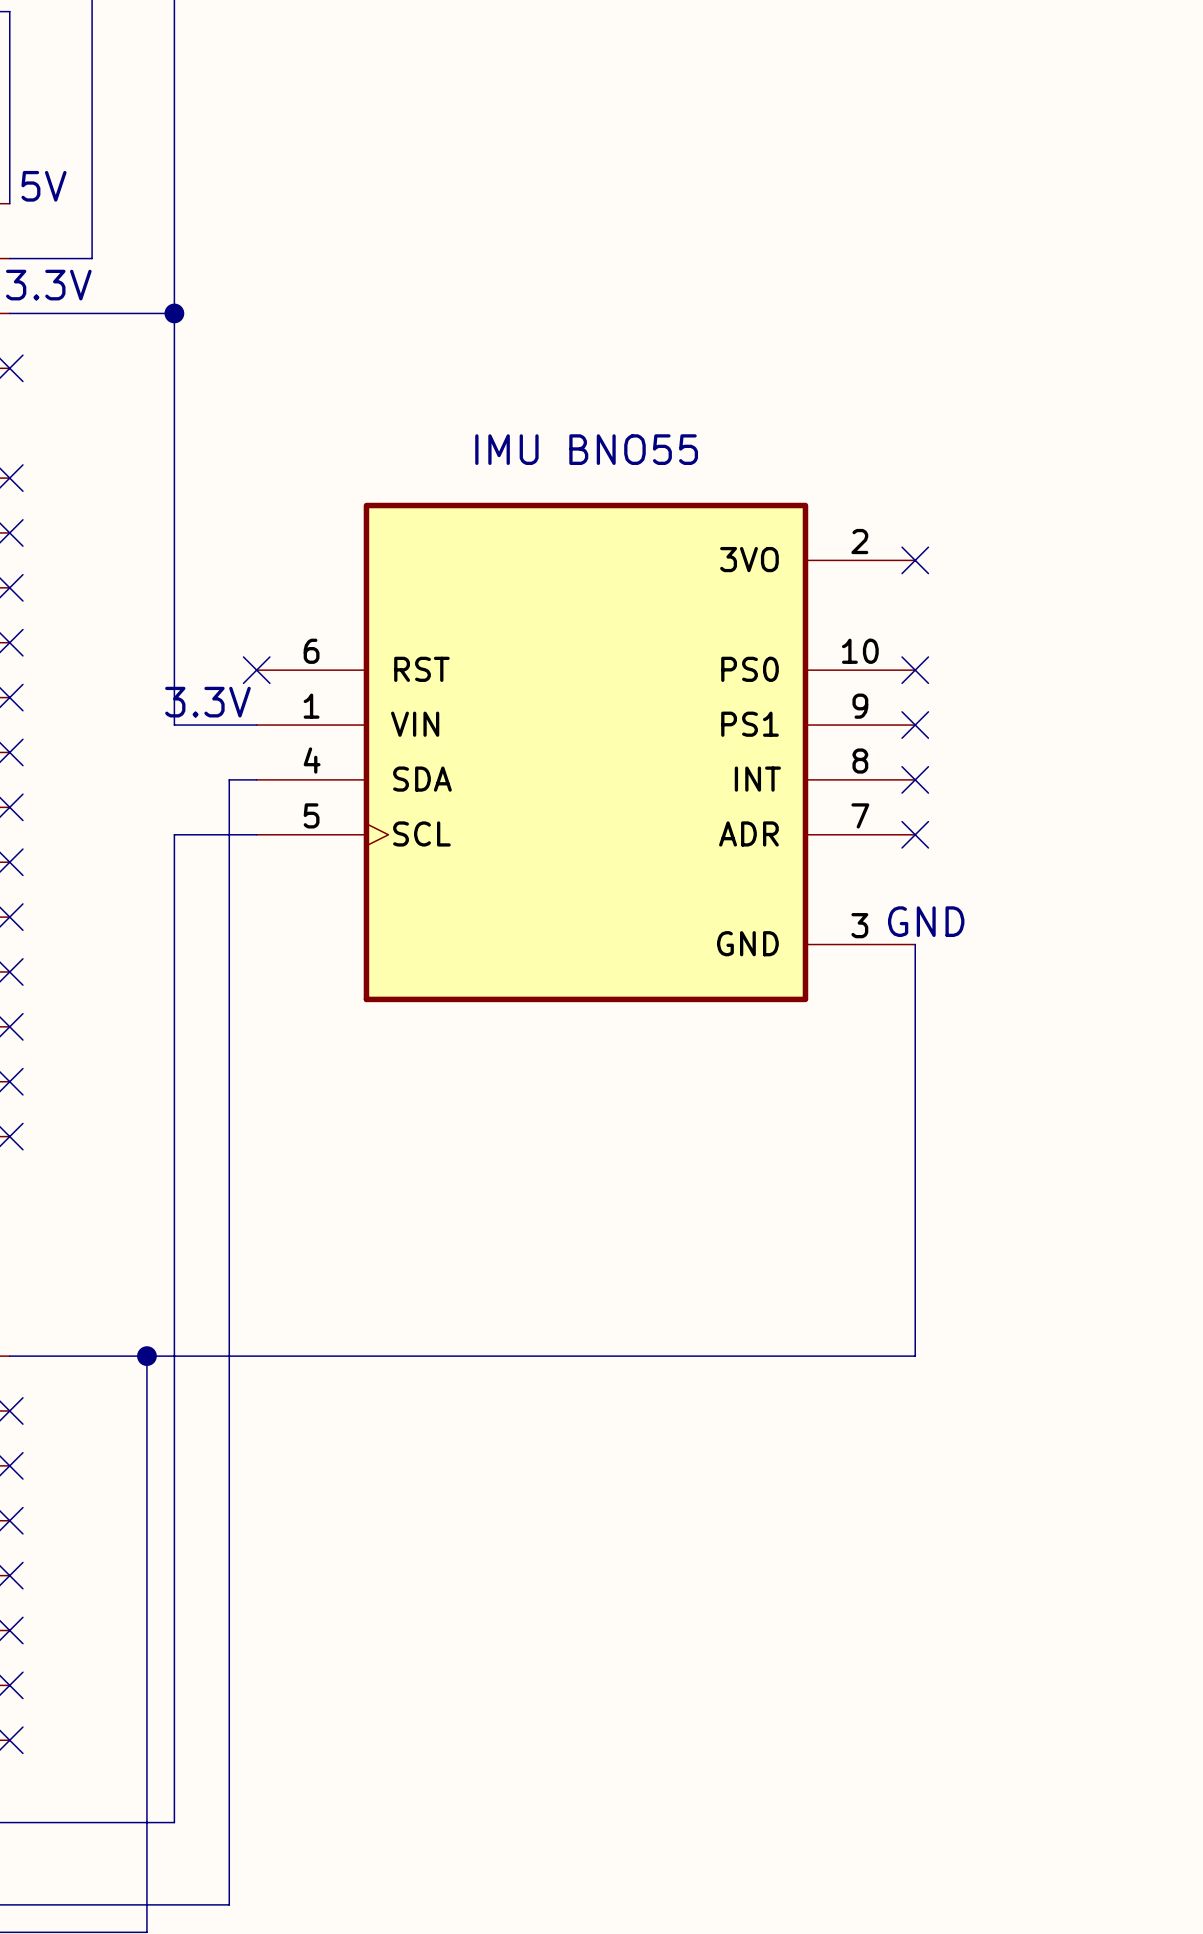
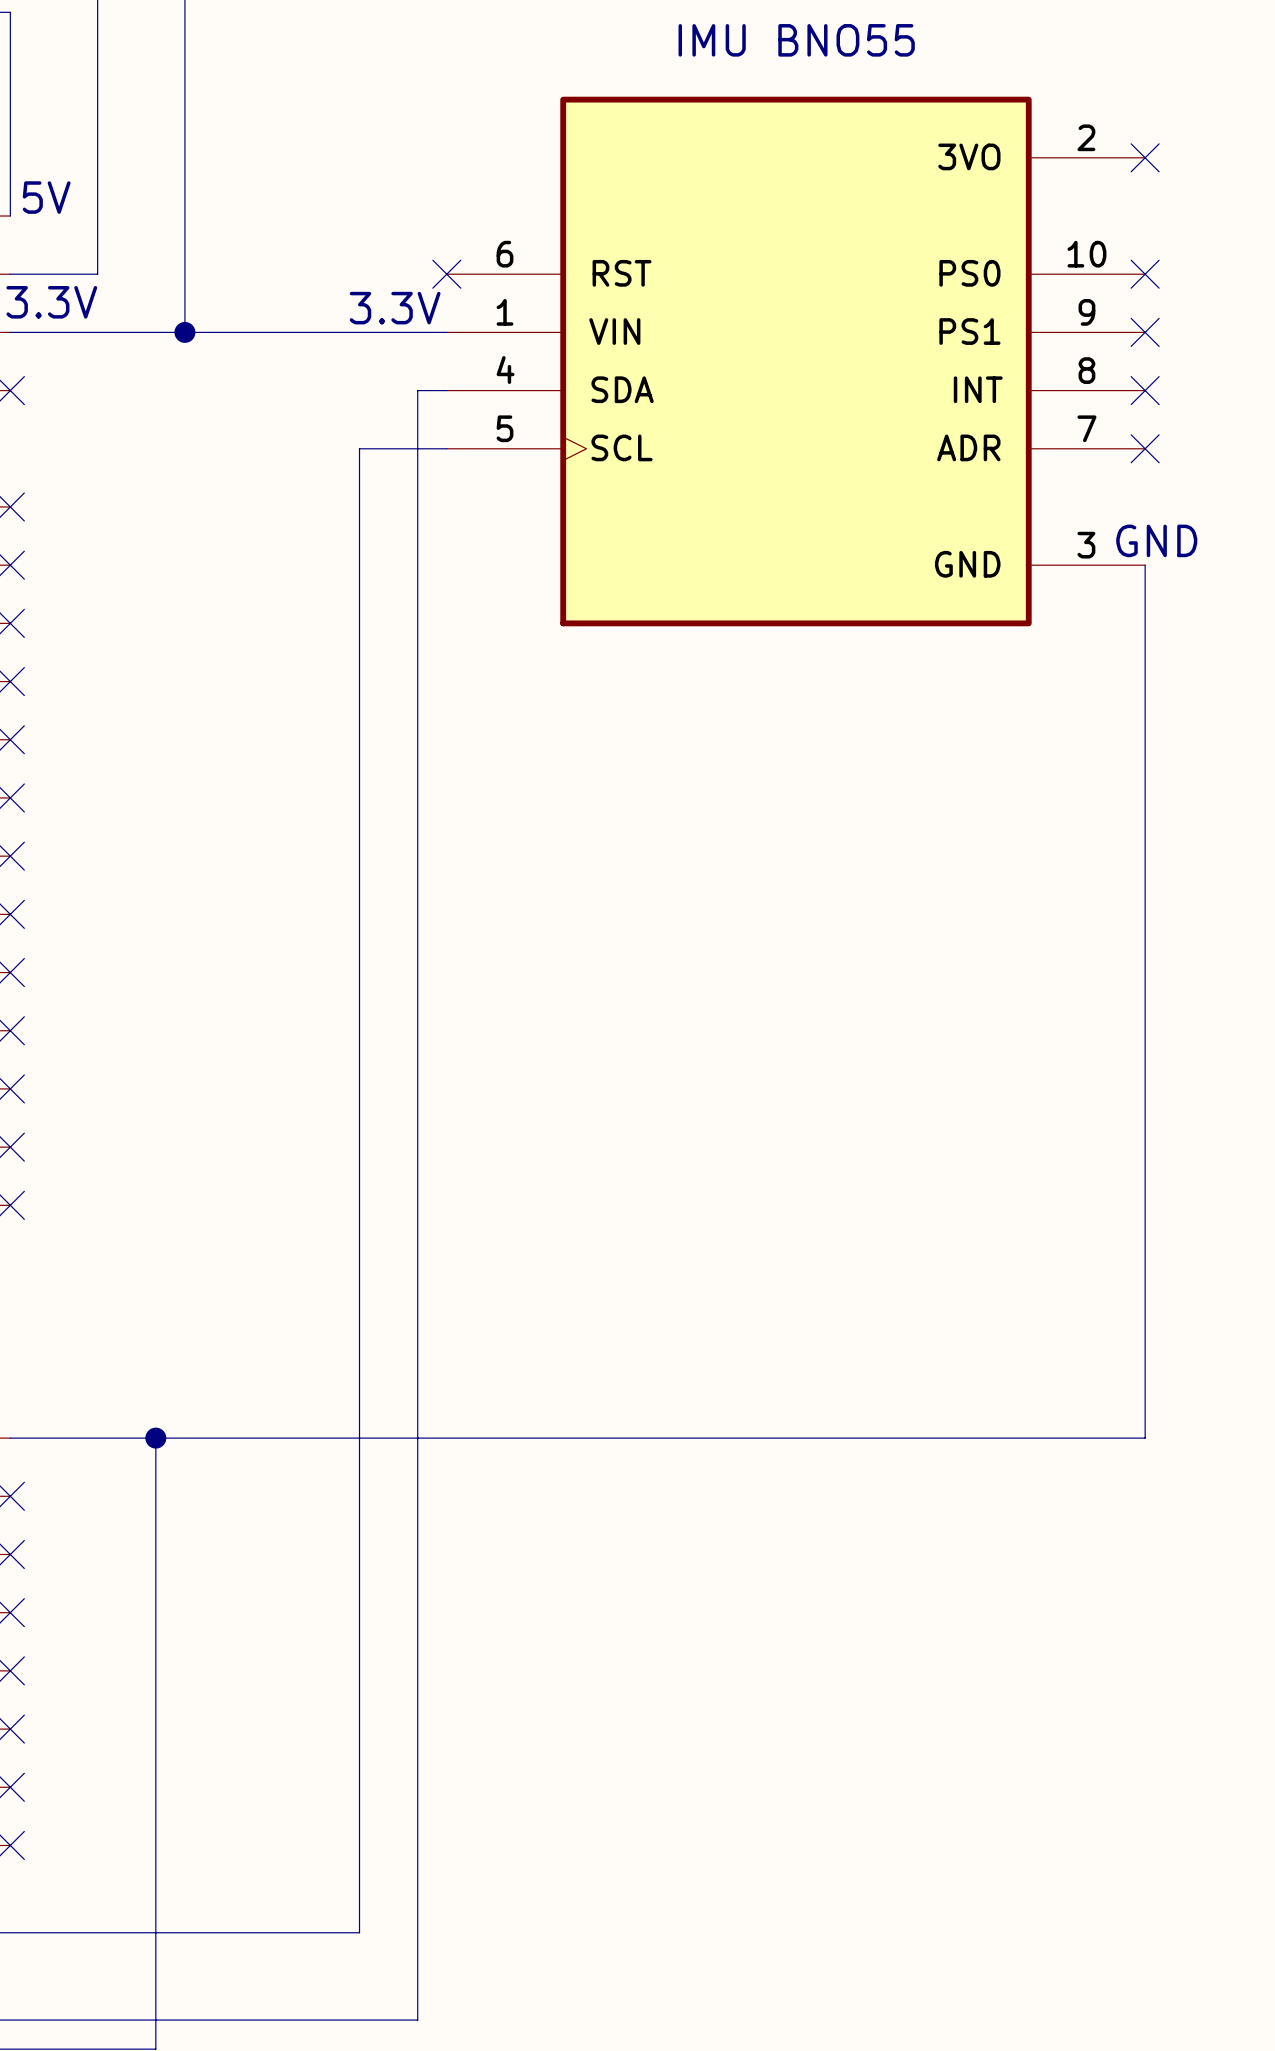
no-connect mark: none -> (1145, 157)
no-connect mark: none -> (446, 274)
no-connect mark: none -> (1145, 274)
wire: (174, 313) (174, 725) (256, 725) -> (184, 332) (446, 332)
no-connect mark: none -> (1145, 332)
no-connect mark: none -> (1145, 390)
no-connect mark: none -> (1145, 448)
no-connect mark: (915, 560) -> none
no-connect mark: (256, 670) -> none
no-connect mark: (915, 670) -> none
text position: 3.3V (207, 702) -> 3.3V (395, 308)
no-connect mark: (915, 725) -> none
part position: (585, 752) -> (795, 361)
wire: (256, 779) (229, 779) (229, 1904) -> (446, 390) (417, 390) (417, 2020) (243, 2020)
no-connect mark: (915, 779) -> none
wire: (256, 834) (174, 834) (174, 1822) -> (446, 448) (359, 448) (359, 1932) (184, 1932)
no-connect mark: (915, 834) -> none
text position: GND (926, 921) -> GND (1156, 540)
wire: (915, 944) (915, 1356) -> (1145, 565) (1145, 1438) (970, 1438)

